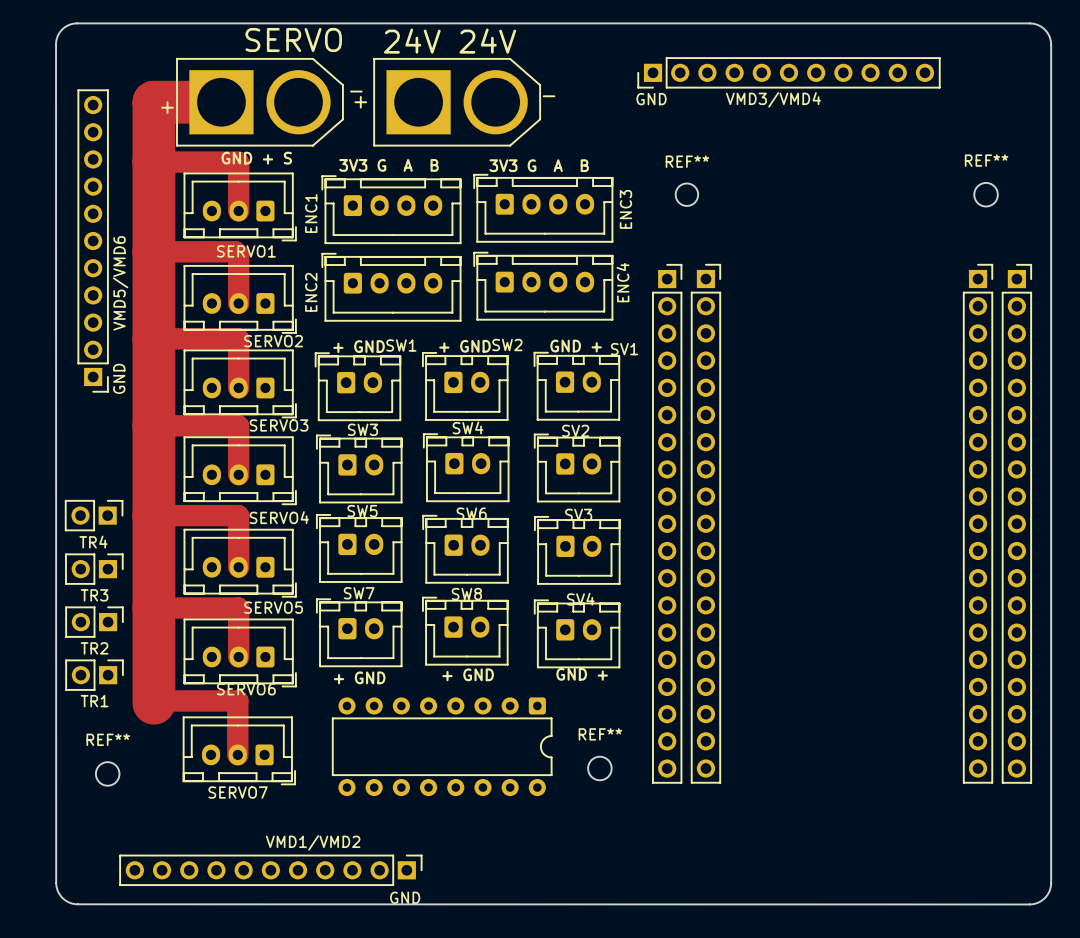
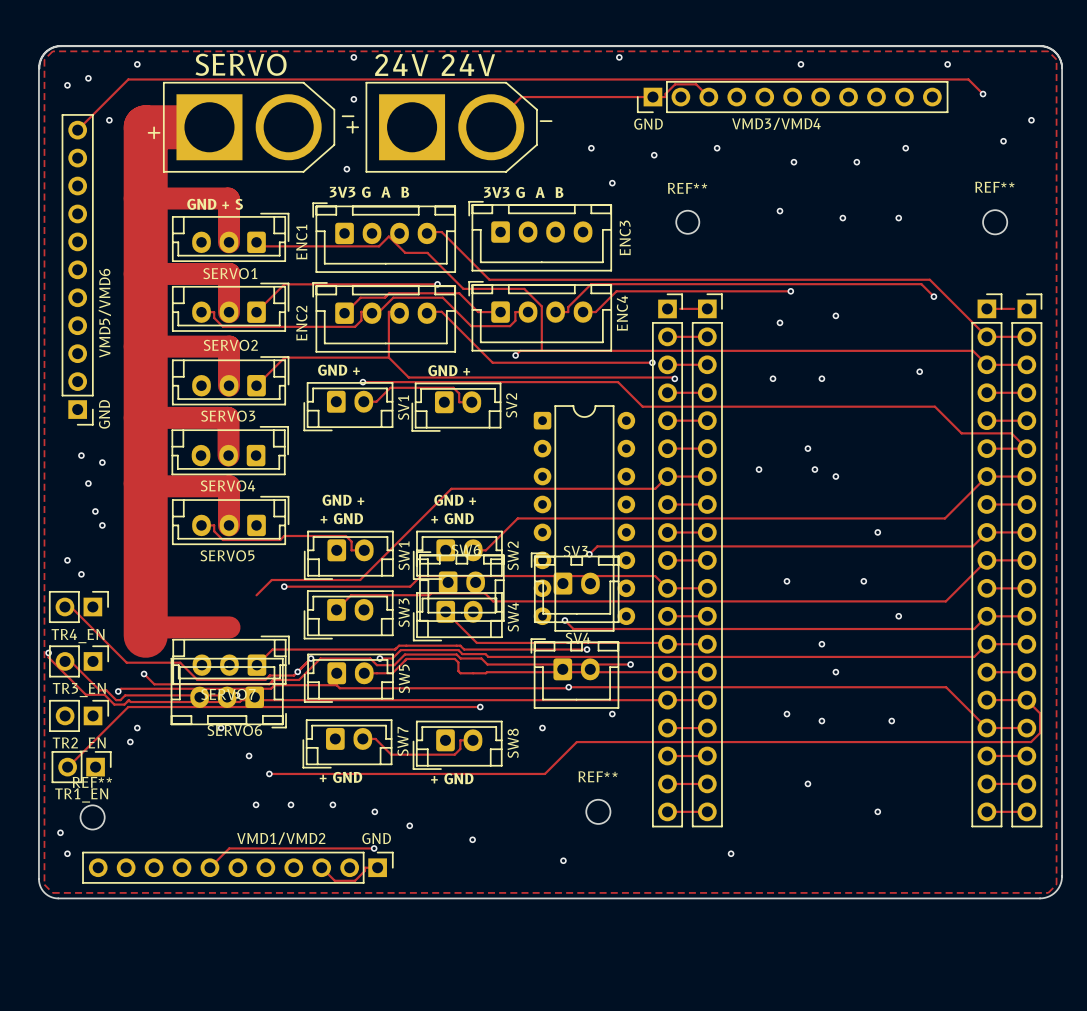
zone outline: none -> (52, 51) (1048, 51) (1056, 59) (1056, 884) (1048, 892) (52, 892) (44, 884) (44, 59) (52, 51)
via: none -> (353, 57)
via: none -> (619, 57)
text position: SERVO (293, 39) -> SERVO (241, 64)
via: none -> (137, 64)
via: none -> (800, 64)
via: none -> (947, 64)
board edge: (56, 45) (56, 882) (58, 892) (64, 899) (77, 904) (1032, 904) (1042, 900) (1050, 888) (1051, 831) -> (1062, 68) (1060, 60) (1055, 52) (1047, 47) (1040, 45) (60, 45) (47, 50) (41, 58) (38, 67) (38, 879) (44, 892) (58, 898) (1040, 898) (1049, 896) (1055, 891) (1059, 885) (1062, 876)
via: none -> (88, 78)
via: none -> (67, 85)
track: none -> (983, 94) (968, 79) (128, 79) (77, 130)
via: none -> (983, 94)
track: none -> (708, 97) (696, 84) (675, 84) (665, 93) (665, 97) (521, 97) (491, 127)
via: none -> (353, 99)
via: none -> (109, 120)
via: none -> (1031, 120)
track: (159, 102) (153, 102) (153, 703) (156, 700) (237, 700) (237, 754) -> (145, 127) (145, 635)
via: none -> (1003, 141)
via: none -> (591, 148)
via: none -> (717, 148)
via: none -> (905, 148)
via: none -> (654, 155)
via: none -> (793, 162)
via: none -> (856, 162)
via: none -> (346, 169)
via: none -> (612, 183)
text position: GND + S (256, 158) -> GND + S (215, 204)
track: (153, 162) (238, 162) (238, 211) -> none
track: none -> (145, 198) (228, 198) (229, 242)
SERVO1 footprint: [183, 172, 297, 242] -> [172, 212, 290, 262]
via: none -> (779, 211)
via: none -> (842, 218)
via: none -> (898, 218)
track: none -> (429, 232) (441, 232) (489, 279) (929, 279) (986, 336) (1026, 336)
track: none -> (256, 242) (260, 246) (379, 246) (388, 236) (405, 252) (427, 252) (463, 288) (524, 288) (541, 306) (541, 350)
track: none -> (145, 273) (229, 273) (229, 312)
track: (153, 251) (235, 251) (238, 254) (238, 303) -> none
track: none -> (437, 284) (284, 284) (256, 312)
via: none -> (437, 284)
track: none -> (790, 291) (616, 291) (595, 312) (583, 312)
via: none -> (790, 291)
SERVO2 footprint: [183, 265, 297, 334] -> [172, 282, 290, 332]
track: none -> (933, 296) (921, 284) (591, 284) (568, 307) (568, 312) (555, 312)
via: none -> (933, 296)
track: none -> (680, 308) (707, 308)
track: none -> (986, 308) (1014, 308)
track: none -> (346, 311) (360, 297) (384, 297) (389, 293) (459, 293) (478, 312) (500, 312)
track: none -> (401, 311) (388, 311) (388, 357)
track: none -> (429, 311) (441, 311) (492, 362) (652, 362)
track: none -> (528, 312) (515, 312) (515, 320) (510, 326) (471, 326) (442, 297) (393, 297) (379, 311) (361, 311) (361, 320) (355, 326) (223, 326) (214, 317) (214, 312) (201, 312)
via: none -> (835, 315)
via: none -> (779, 322)
track: none -> (667, 336) (707, 336)
track: none -> (145, 346) (229, 346) (229, 385)
track: none -> (515, 355) (520, 350) (972, 350) (986, 364) (1026, 364)
via: none -> (515, 355)
track: none -> (388, 357) (408, 377) (674, 378)
track: none -> (388, 357) (284, 357) (256, 385)
via: none -> (652, 362)
track: none -> (667, 364) (707, 364)
track: (153, 338) (238, 338) (238, 387) -> none
via: none -> (919, 371)
SERVO2 name position: SERVO2 (273, 341) -> SERVO2 (230, 345)
SW1 name position: SW1 (401, 345) -> SW1 (404, 555)
SW2 name position: SW2 (507, 345) -> SW2 (513, 555)
text: + GND (359, 346) -> GND + (338, 370)
text: + GND (464, 346) -> GND + (449, 370)
text: GND + (576, 346) -> none
via: none -> (674, 378)
via: none -> (773, 378)
via: none -> (821, 378)
SERVO3 footprint: [183, 349, 297, 419] -> [172, 356, 290, 406]
SV1 name position: SV1 (624, 349) -> SV1 (403, 407)
track: none -> (362, 382) (618, 382) (642, 406) (934, 406) (961, 433) (1011, 433) (1026, 448) (986, 448)
via: none -> (362, 382)
SW1 footprint: [314, 352, 401, 421] -> [304, 530, 394, 580]
SW2 footprint: [422, 352, 509, 421] -> [413, 530, 503, 580]
SV1 footprint: [533, 352, 620, 421] -> [303, 382, 394, 432]
track: none -> (667, 392) (707, 392)
track: none -> (986, 392) (1026, 392)
track: none -> (363, 401) (376, 401) (390, 387) (453, 387) (459, 393) (459, 402) (471, 402)
track: none -> (145, 417) (228, 417) (228, 455)
track: none -> (667, 420) (707, 420)
track: none -> (986, 420) (1026, 420)
track: none -> (667, 448) (707, 448)
via: none -> (807, 448)
via: none -> (81, 455)
track: (153, 425) (238, 425) (238, 474) -> none
SERVO3 name position: SERVO3 (279, 425) -> SERVO3 (228, 416)
SW4 name position: SW4 (468, 427) -> SW4 (513, 617)
via: none -> (102, 462)
SW3 name position: SW3 (362, 429) -> SW3 (404, 612)
SV2 name position: SV2 (575, 430) -> SV2 (511, 405)
SW4 footprint: [423, 433, 510, 502] -> [413, 592, 503, 642]
SV2 footprint: [534, 433, 621, 503] -> [411, 382, 502, 432]
SW3 footprint: [316, 434, 403, 504] -> [303, 590, 394, 640]
via: none -> (759, 469)
via: none -> (814, 469)
SERVO4 footprint: [183, 436, 297, 505] -> [171, 426, 289, 476]
track: none -> (707, 476) (667, 476) (655, 488) (451, 488) (360, 580) (271, 580) (256, 595)
via: none -> (835, 476)
track: none -> (1026, 476) (986, 476) (944, 518) (517, 518) (485, 550) (473, 550)
via: none -> (88, 483)
track: none -> (148, 486) (229, 486) (229, 525)
text: none -> GND + (343, 500)
text: none -> GND + (455, 500)
track: none -> (667, 504) (707, 504)
track: none -> (986, 504) (1026, 504)
via: none -> (95, 511)
part: none -> (584, 518)
text: none -> + GND (341, 518)
text: none -> + GND (452, 518)
via: none -> (102, 525)
track: none -> (201, 525) (214, 525) (214, 531) (222, 540) (280, 540) (284, 536) (345, 536) (351, 541) (351, 550) (364, 550)
track: none -> (667, 532) (707, 532)
via: none -> (877, 532)
track: none -> (1026, 532) (986, 532) (972, 546) (597, 546) (589, 554)
SW5 name position: SW5 (362, 511) -> SW5 (404, 678)
SW5 footprint: [316, 514, 403, 583] -> [304, 653, 394, 703]
TR4: (94, 515) -> none
track: (153, 515) (238, 515) (238, 567) -> none
SERVO4 name position: SERVO4 (279, 517) -> SERVO4 (227, 485)
via: none -> (589, 554)
via: none -> (67, 560)
track: none -> (667, 560) (707, 560)
track: none -> (1026, 560) (986, 560) (945, 601) (493, 601) (485, 593) (430, 593) (429, 595) (351, 595) (336, 609)
SERVO5 footprint: [183, 529, 297, 598] -> [172, 496, 290, 545]
via: none -> (81, 574)
via: none -> (786, 581)
via: none -> (863, 581)
track: none -> (284, 586) (410, 586) (420, 576) (655, 576) (667, 588)
via: none -> (284, 586)
track: none -> (667, 588) (707, 588)
track: none -> (986, 588) (1026, 588)
track: none -> (67, 603) (126, 662) (180, 662) (197, 679) (265, 679) (269, 675) (294, 675) (311, 658)
track: none -> (445, 611) (476, 642) (707, 644)
track: none -> (667, 616) (707, 616)
via: none -> (898, 616)
track: none -> (986, 616) (974, 629) (573, 629) (564, 620)
track: none -> (986, 616) (1026, 616)
via: none -> (564, 620)
track: none -> (154, 627) (229, 627)
SW7 name position: SW7 (359, 593) -> SW7 (402, 741)
SW8 name position: SW8 (466, 594) -> SW8 (513, 743)
TR3 name: TR3 (94, 595) -> TR4_EN (78, 636)
SW8 footprint: [422, 597, 509, 666] -> [412, 720, 503, 770]
SW7 footprint: [316, 598, 403, 667] -> [302, 719, 393, 769]
via: none -> (821, 644)
track: none -> (1026, 644) (986, 644) (974, 656) (488, 656) (485, 654) (462, 654) (458, 650) (400, 650) (392, 658) (379, 658)
SERVO5 name position: SERVO5 (273, 607) -> SERVO5 (227, 555)
track: (153, 608) (238, 608) (238, 657) -> none
track: none -> (587, 649) (464, 649) (460, 645) (399, 645) (395, 649) (272, 649) (256, 665)
via: none -> (587, 649)
track: none -> (48, 652) (48, 657) (85, 694) (104, 694) (114, 704) (124, 704) (128, 700) (130, 702) (239, 702) (241, 700) (707, 700)
via: none -> (48, 652)
track: none -> (67, 658) (99, 690) (106, 690) (116, 700) (120, 700) (125, 695) (237, 695)
via: none -> (311, 658)
via: none -> (379, 658)
track: none -> (630, 664) (487, 664) (481, 658) (460, 658) (456, 654) (404, 654) (394, 665) (376, 665) (370, 658) (320, 658) (299, 679) (273, 679) (269, 684) (154, 684) (144, 674)
via: none -> (630, 664)
via: none -> (297, 671)
track: none -> (667, 672) (707, 672)
track: none -> (667, 672) (460, 673) (458, 671) (458, 662) (454, 658) (406, 658) (392, 673) (364, 673)
via: none -> (835, 672)
track: none -> (986, 672) (1026, 672)
via: none -> (144, 674)
track: none -> (336, 685) (274, 685) (271, 688) (120, 688) (118, 691)
track: none -> (336, 685) (339, 688) (946, 687) (986, 728) (1026, 728)
via: none -> (568, 687)
TR2 name: TR2 (94, 648) -> TR3_EN (79, 690)
via: none -> (118, 691)
via: none -> (237, 695)
track: none -> (986, 700) (1026, 700) (1040, 713) (1040, 733) (1031, 742) (576, 742) (544, 773) (269, 773)
track: none -> (480, 707) (128, 707) (67, 767)
via: none -> (480, 707)
via: none -> (612, 714)
via: none -> (786, 714)
text: + GND (468, 674) -> none
text: GND + (582, 674) -> none
text position: + GND (359, 677) -> + GND (340, 777)
via: none -> (821, 721)
via: none -> (891, 721)
via: none -> (137, 728)
via: none -> (221, 728)
via: none -> (542, 728)
track: none -> (667, 728) (707, 728)
track: none -> (362, 738) (375, 738) (391, 754) (454, 754) (460, 749) (460, 740) (473, 740)
via: none -> (130, 741)
TR1 name: TR1 (94, 701) -> TR2_EN (79, 744)
via: none -> (249, 755)
track: none -> (667, 756) (707, 756)
track: none -> (986, 755) (1026, 755)
SERVO7 footprint: [182, 716, 296, 785] -> [172, 635, 290, 685]
TR1_EN: none -> (81, 767)
via: none -> (269, 773)
text: none -> + GND (452, 778)
track: none -> (667, 783) (707, 783)
via: none -> (807, 783)
track: none -> (986, 783) (1026, 783)
part: (442, 746) -> none
via: none -> (256, 804)
via: none -> (291, 804)
via: none -> (332, 804)
via: none -> (374, 811)
track: none -> (667, 811) (707, 811)
via: none -> (877, 811)
track: none -> (986, 811) (1026, 811)
via: none -> (409, 825)
via: none -> (60, 832)
via: none -> (472, 839)
track: none -> (374, 848) (229, 848) (209, 867)
via: none -> (374, 848)
via: none -> (67, 853)
via: none -> (731, 853)
via: none -> (563, 860)
track: none -> (321, 867) (334, 880) (355, 880) (364, 870) (364, 867) (377, 867)
VMD1/VMD2 position: (270, 870) -> (237, 867)
text position: GND (405, 897) -> GND (376, 838)

